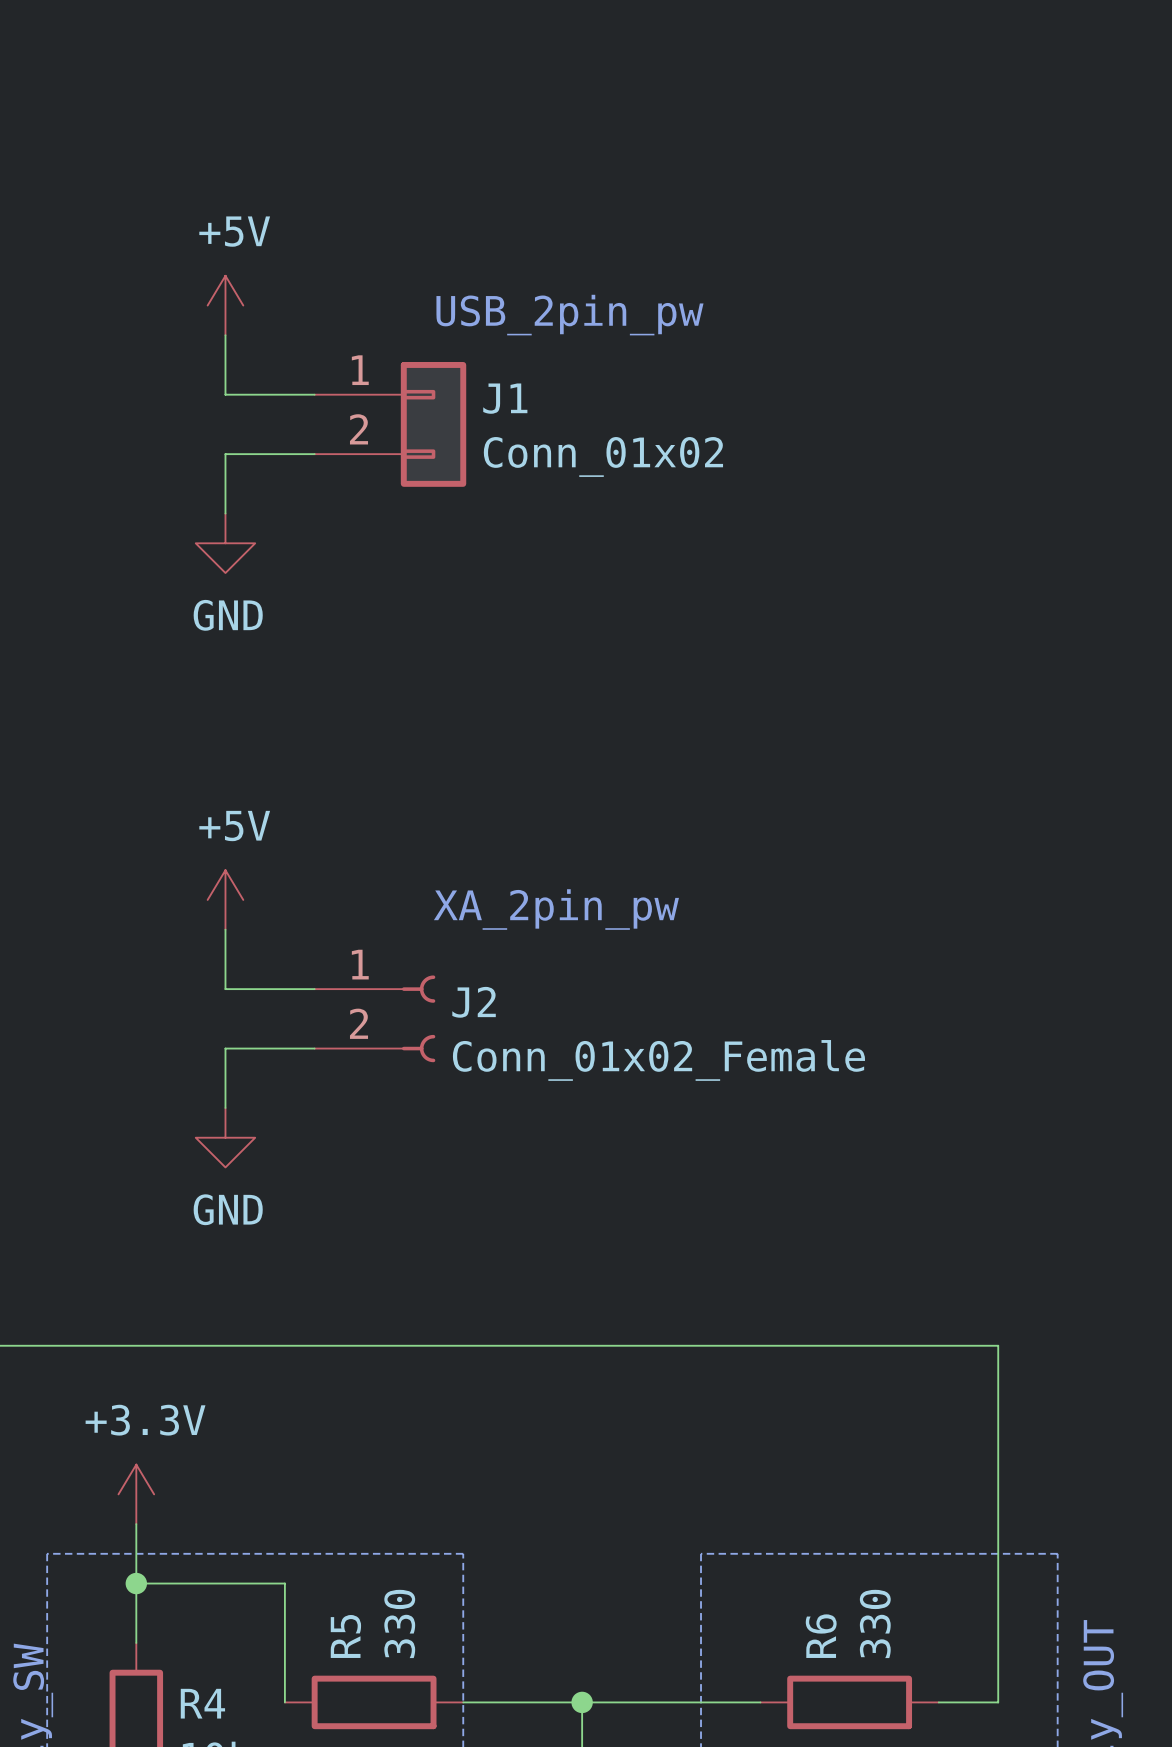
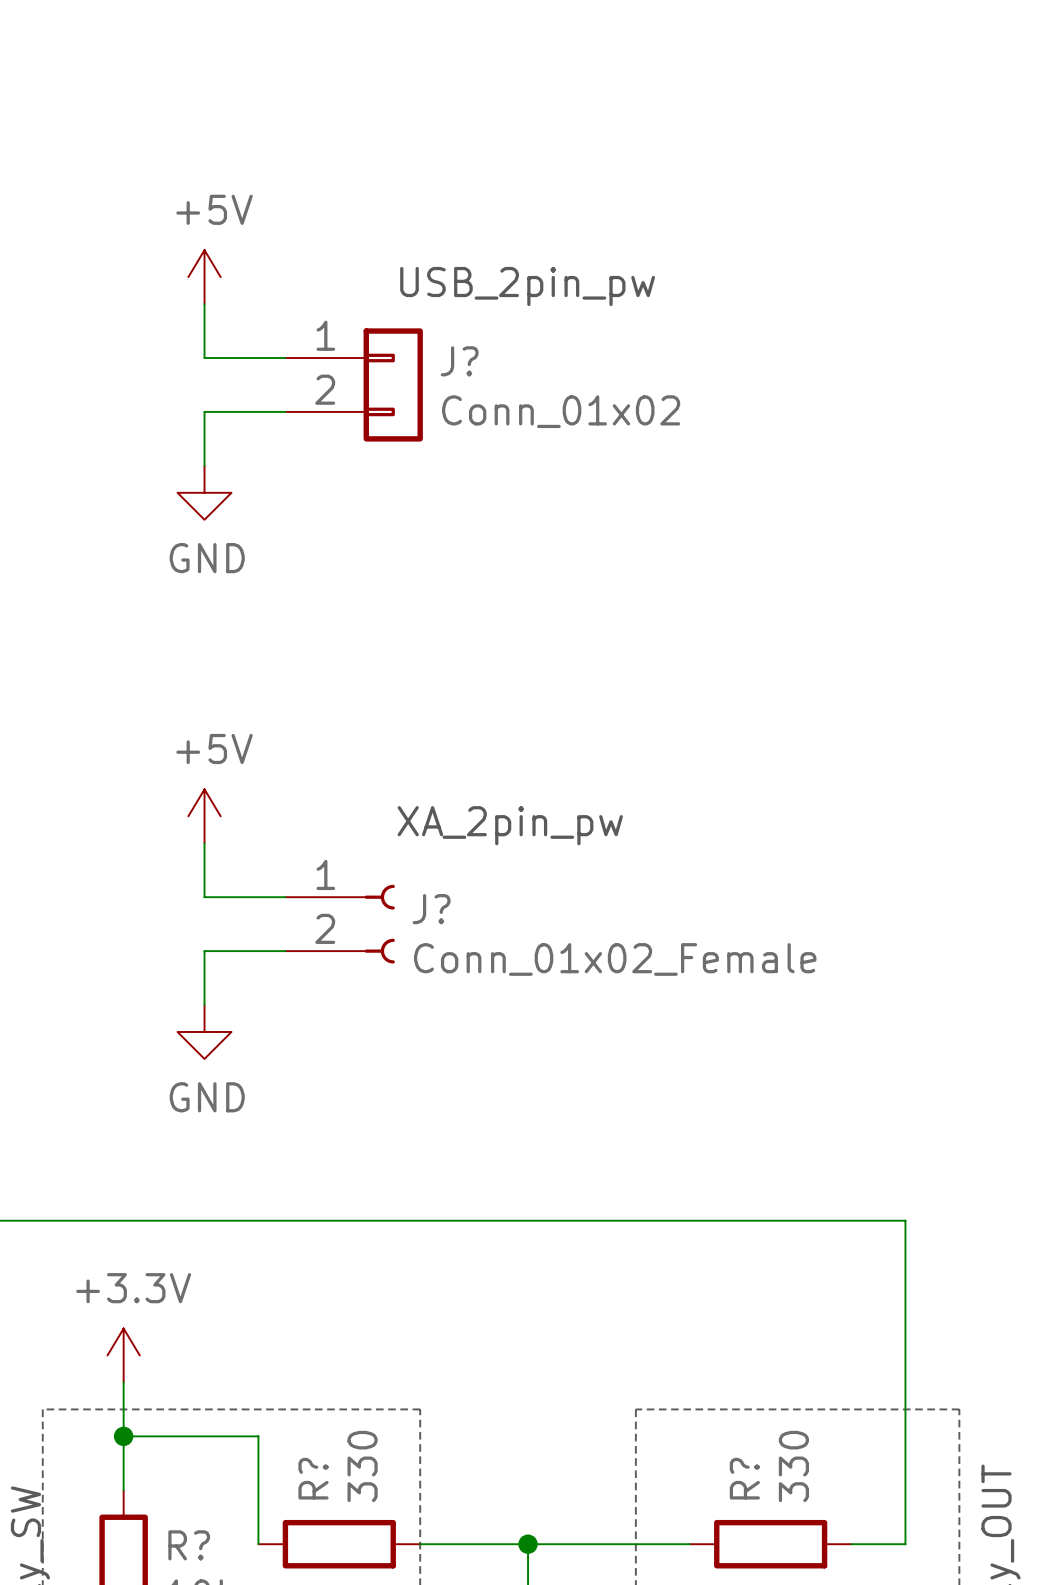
J1 name: J1 (505, 398) -> J? (459, 361)
J2 name: J2 (474, 1002) -> J? (431, 909)
R5 name: R5 (345, 1636) -> R? (313, 1478)
R6 name: R6 (821, 1636) -> R? (744, 1478)
R4 name: R4 (202, 1703) -> R? (189, 1545)

